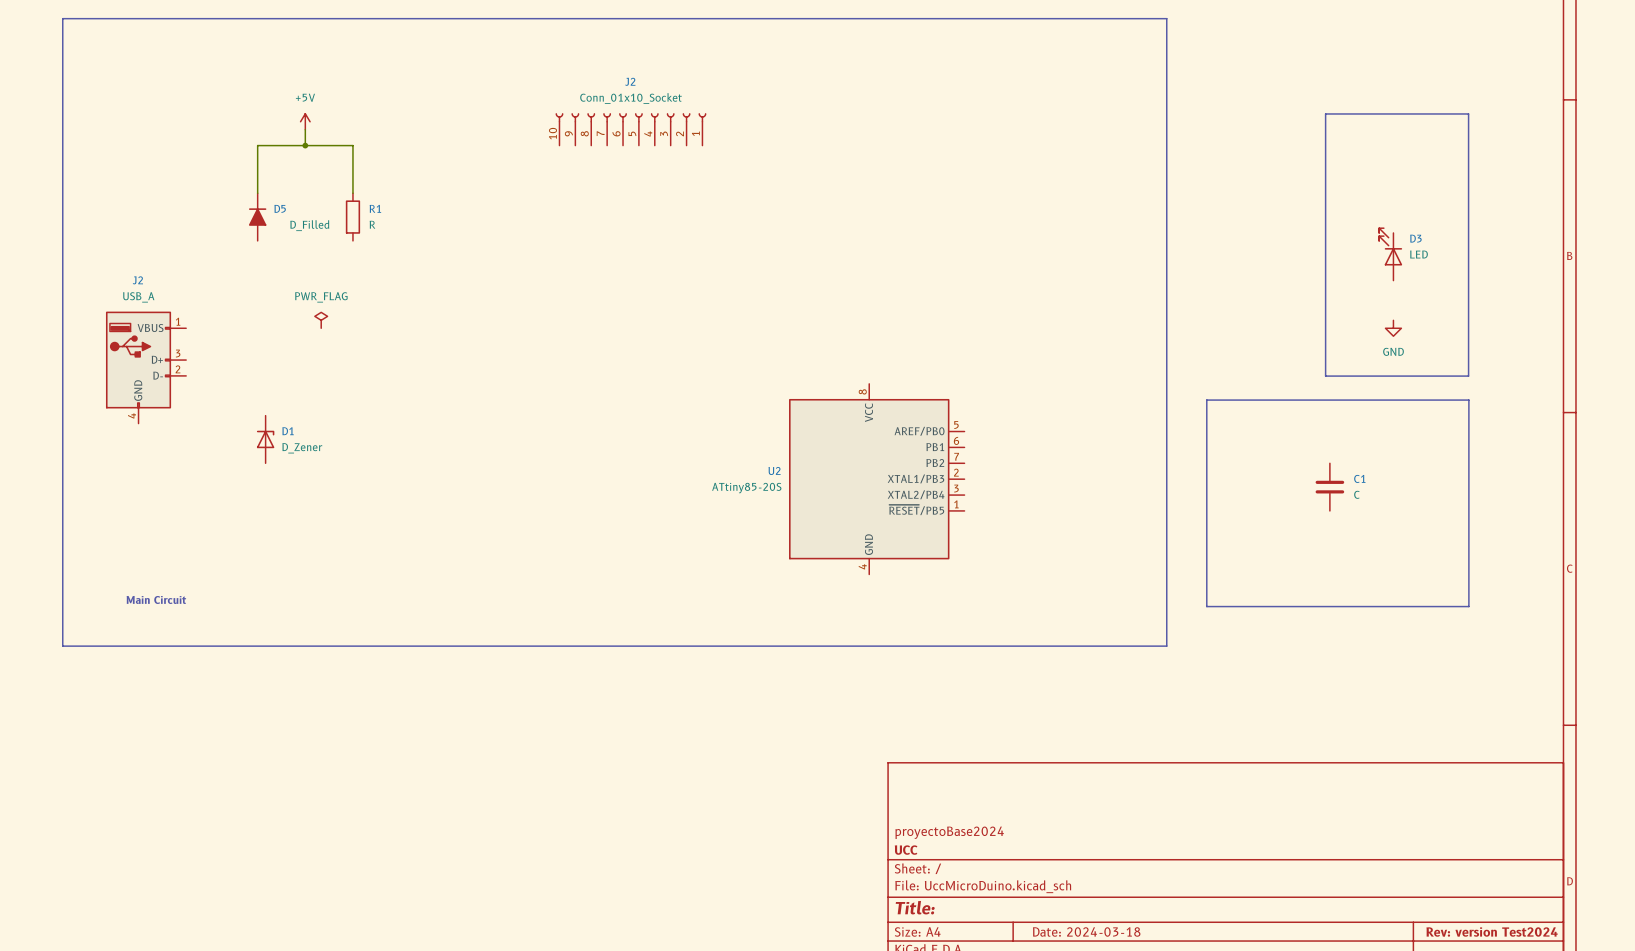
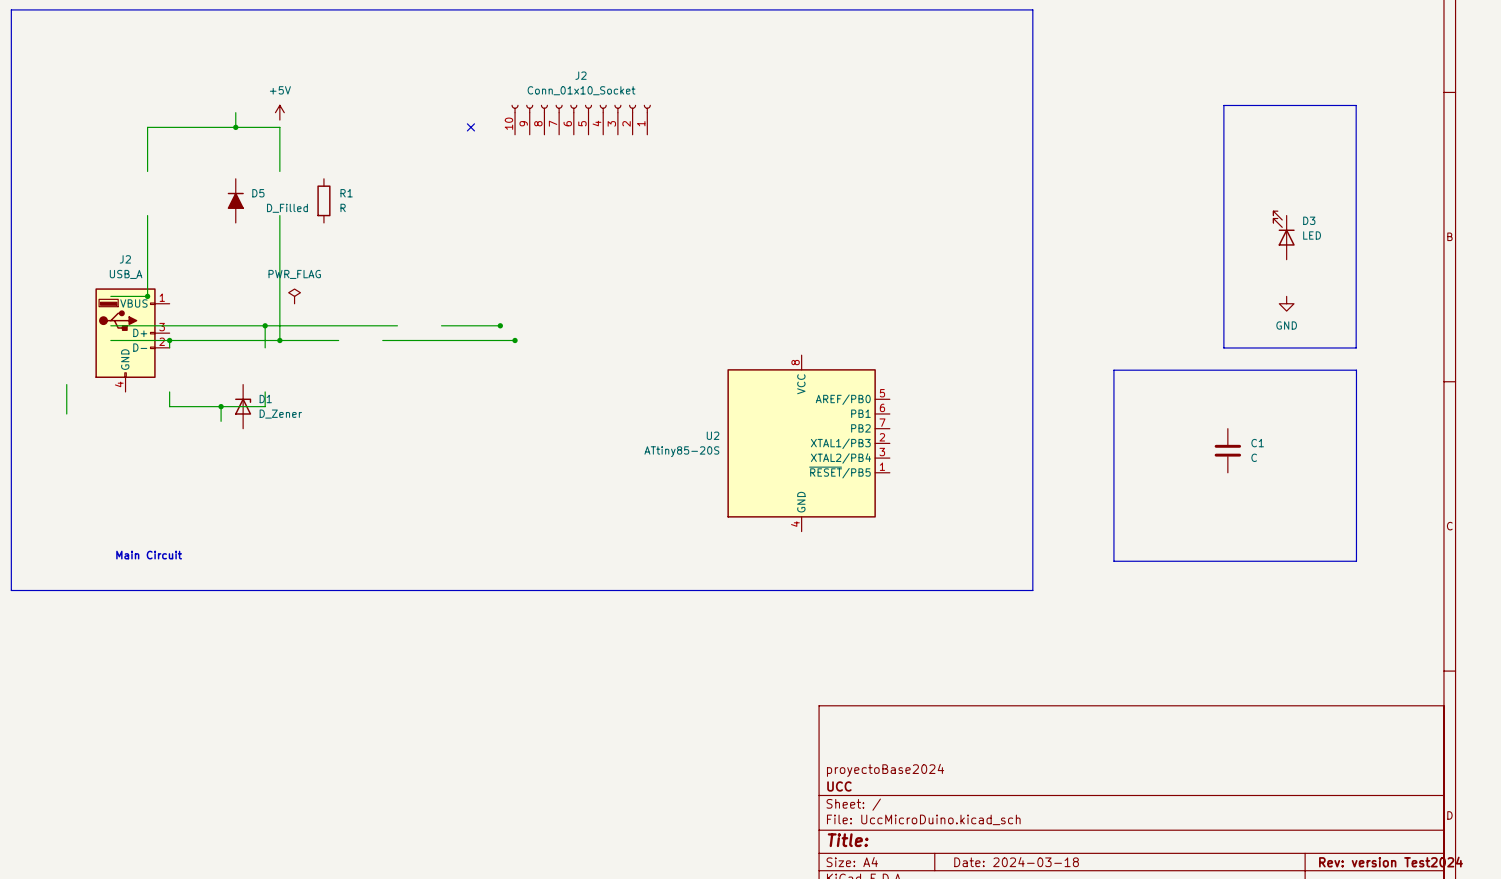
line: (62, 18) (62, 646) (1166, 646) (1166, 18) (62, 18) -> (11, 9) (11, 590) (1032, 590) (1032, 9) (11, 9)
wire: none -> (235, 112) (235, 127)
wire: (305, 129) (305, 137) -> (147, 171) (147, 127) (279, 127)
junction: none -> (235, 127)
no-connect mark: none -> (470, 127)
wire: none -> (279, 134) (279, 171)
junction: (305, 145) -> none
wire: (257, 193) (257, 145) (352, 145) (352, 193) -> none
wire: none -> (147, 215) (147, 296) (110, 296)
wire: none -> (279, 215) (279, 340)
junction: none -> (147, 296)
wire: none -> (110, 325) (397, 325)
wire: none -> (265, 325) (265, 347)
junction: none -> (265, 325)
wire: none -> (441, 325) (500, 325)
junction: none -> (500, 325)
wire: none -> (110, 340) (338, 340)
wire: none -> (169, 340) (169, 347)
junction: none -> (169, 340)
junction: none -> (279, 340)
wire: none -> (382, 340) (515, 340)
junction: none -> (515, 340)
wire: none -> (66, 384) (66, 413)
wire: none -> (169, 391) (169, 406) (265, 406) (265, 391)
wire: none -> (221, 406) (221, 421)
junction: none -> (221, 406)

